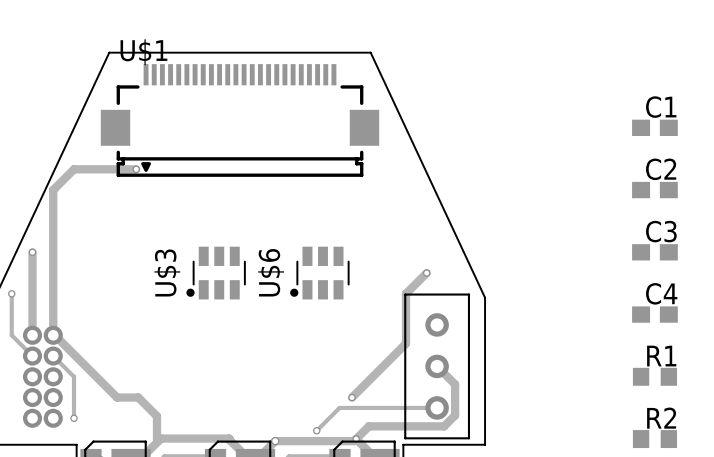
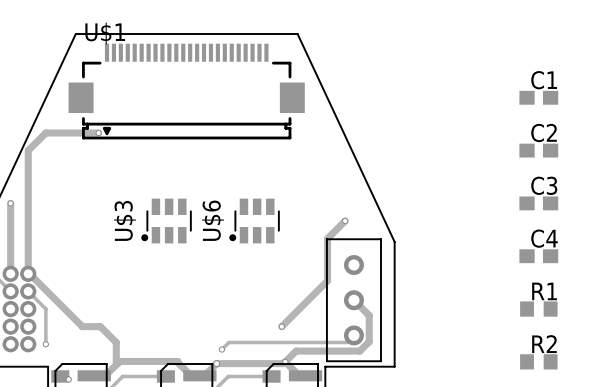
track: (437, 407) (339, 407) (316, 430) -> (353, 335) (346, 342) (228, 342) (221, 349)
via position: (316, 430) -> (221, 349)

